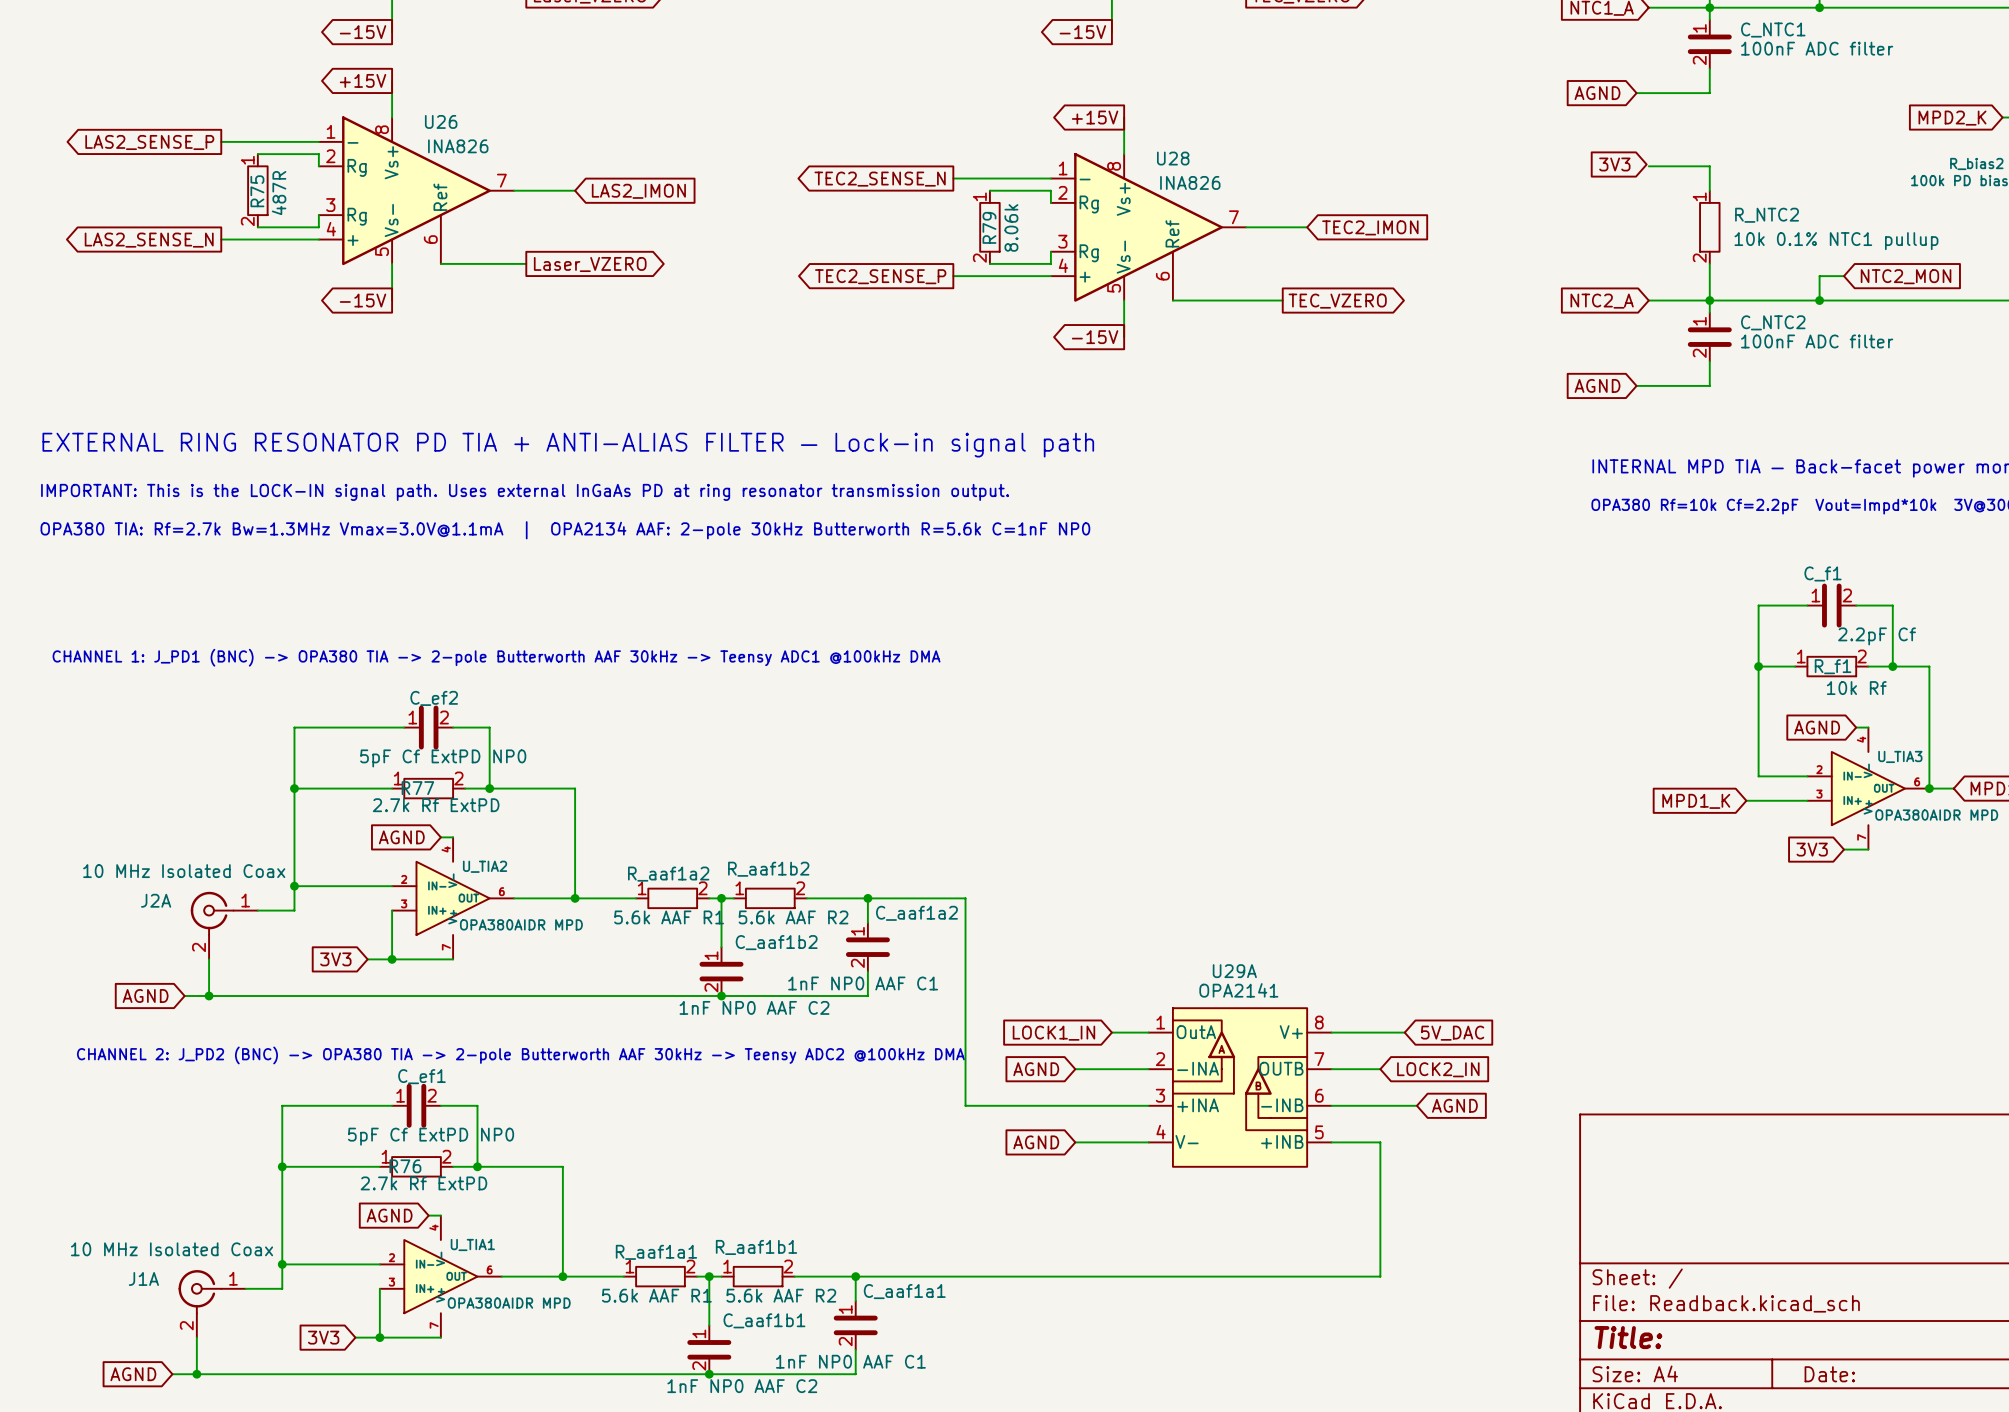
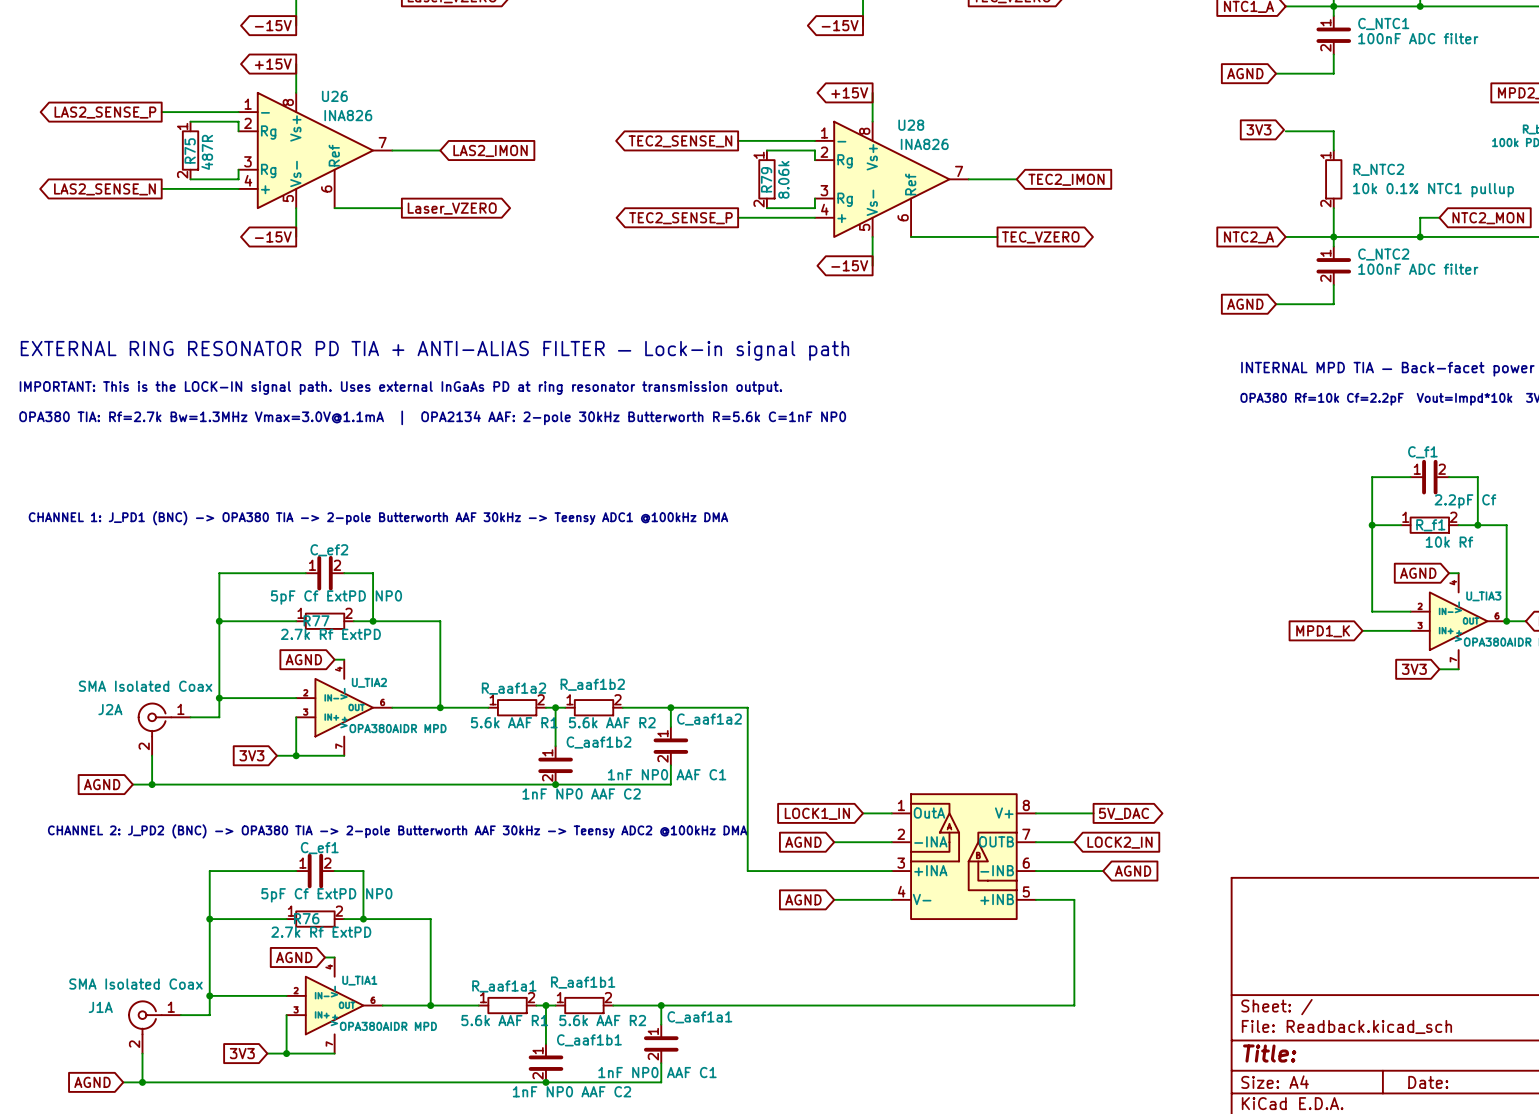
J2A value: 10 MHz Isolated Coax (184, 871) -> SMA Isolated Coax (145, 686)
U29A name: U29A (1234, 971) -> none
U29A value: OPA2141 (1238, 990) -> none
global label shape: input (1452, 1033) -> output (1124, 813)
J1A value: 10 MHz Isolated Coax (172, 1249) -> SMA Isolated Coax (135, 984)

